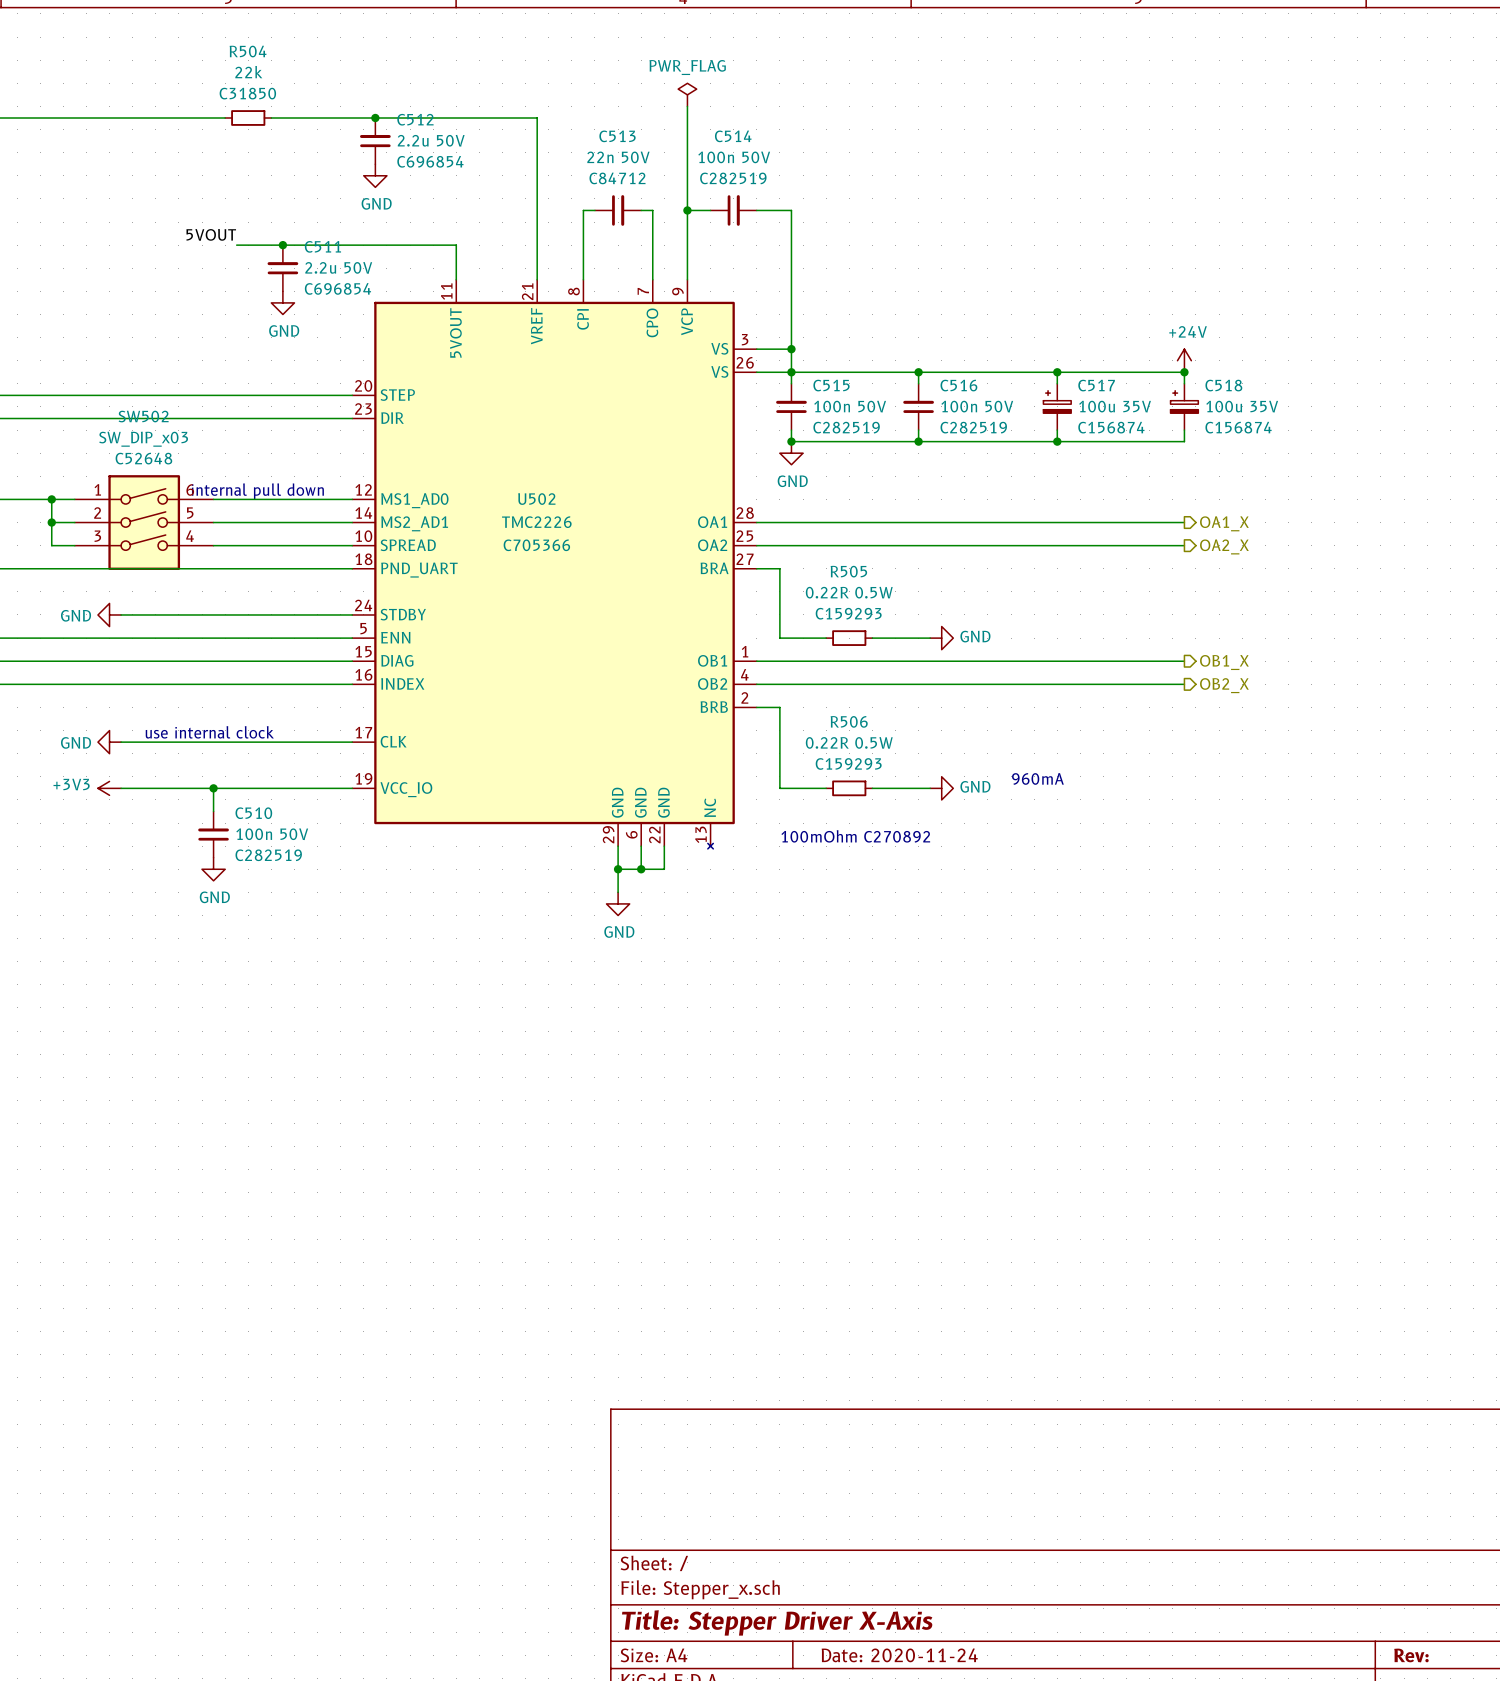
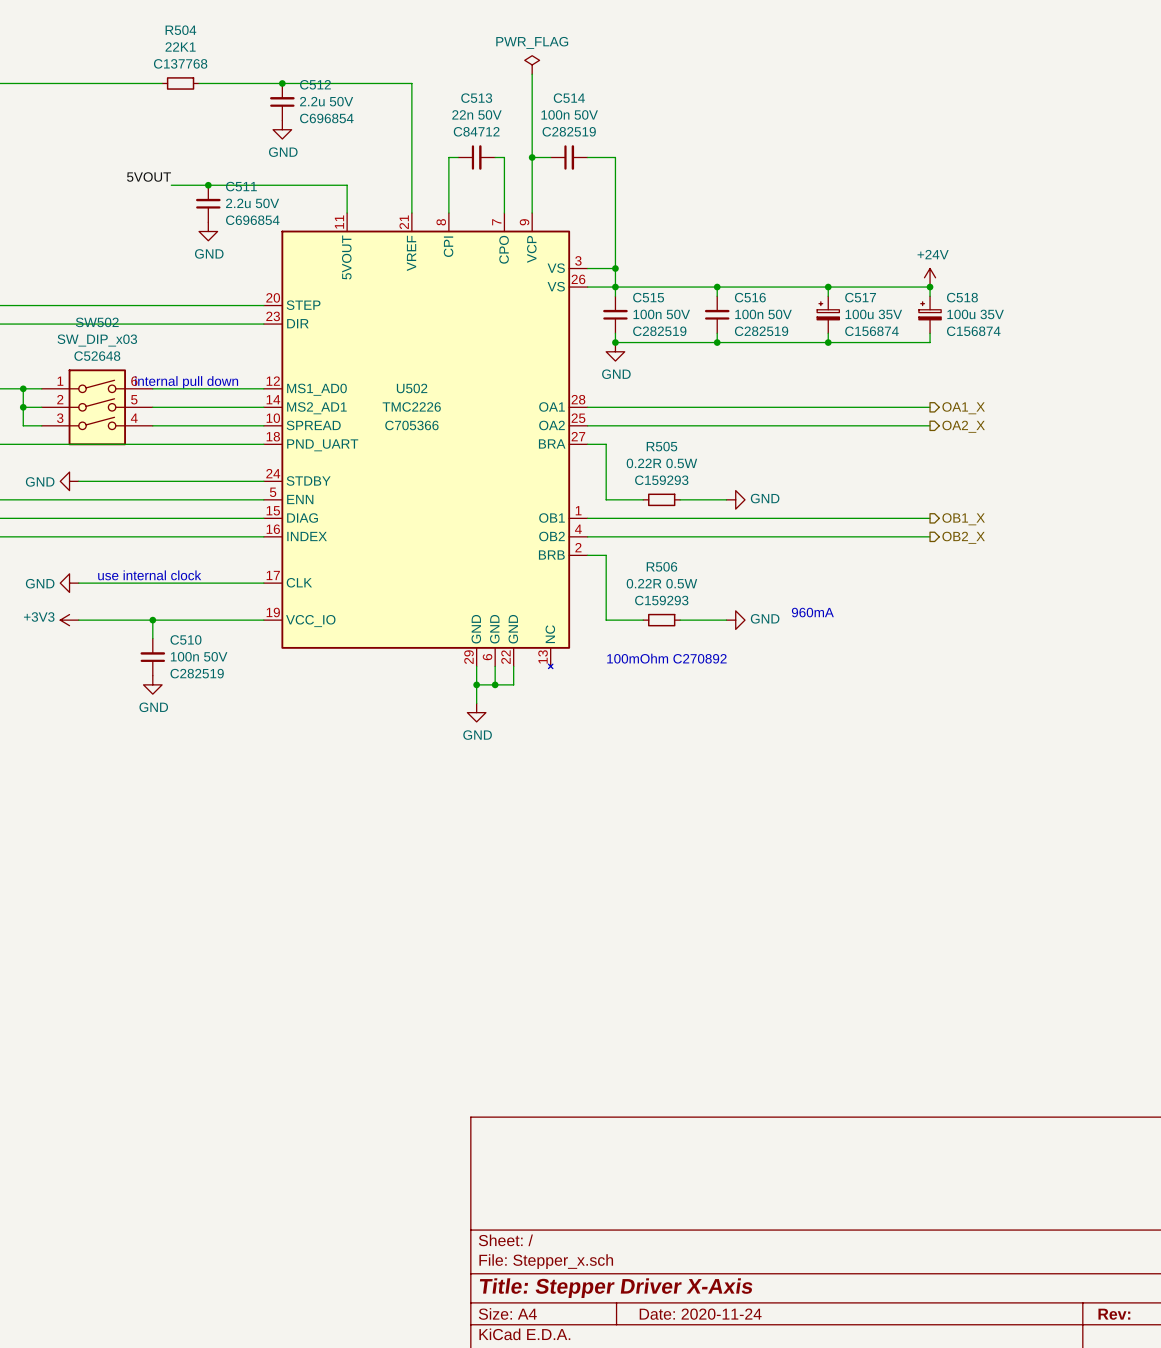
R504 value: 22k (248, 72) -> 22K1 (180, 46)
R504 text: C31850 (247, 93) -> C137768 (180, 63)

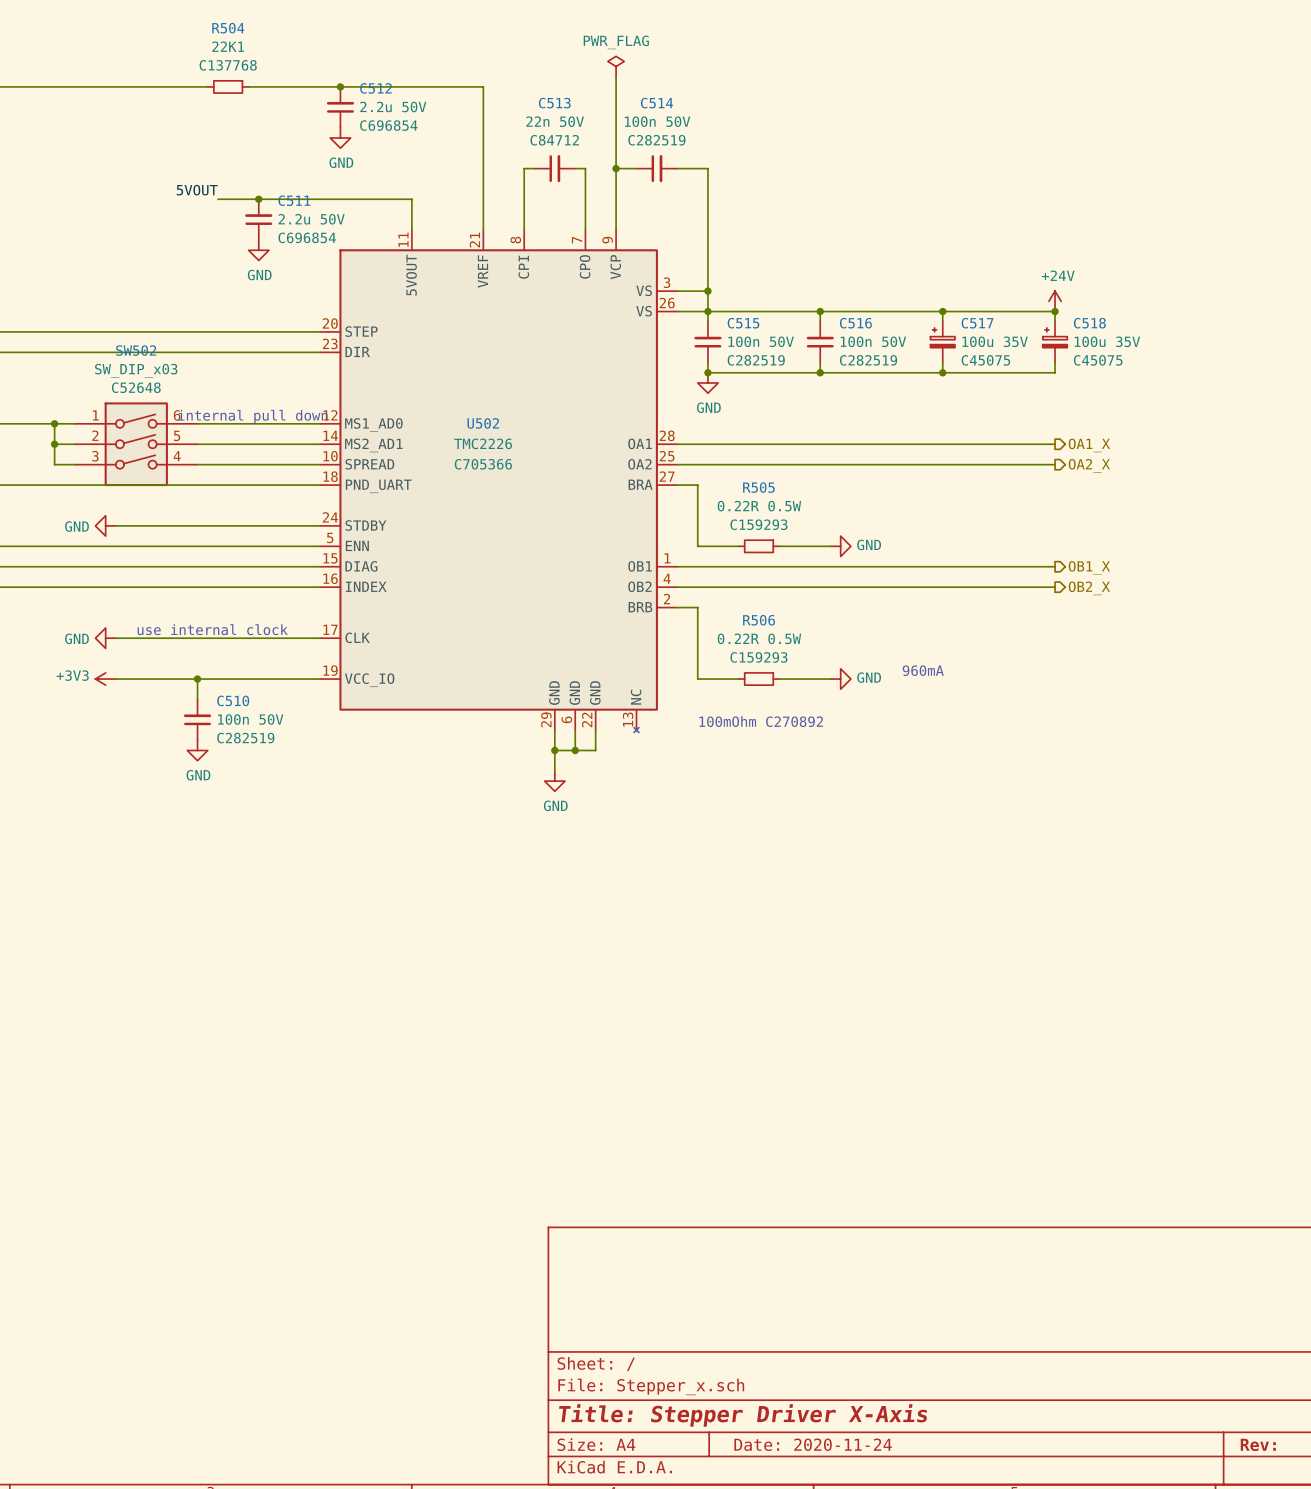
C517 text: C156874 (871, 331) -> C45075 (985, 360)
C518 text: C156874 (973, 331) -> C45075 (1098, 360)

